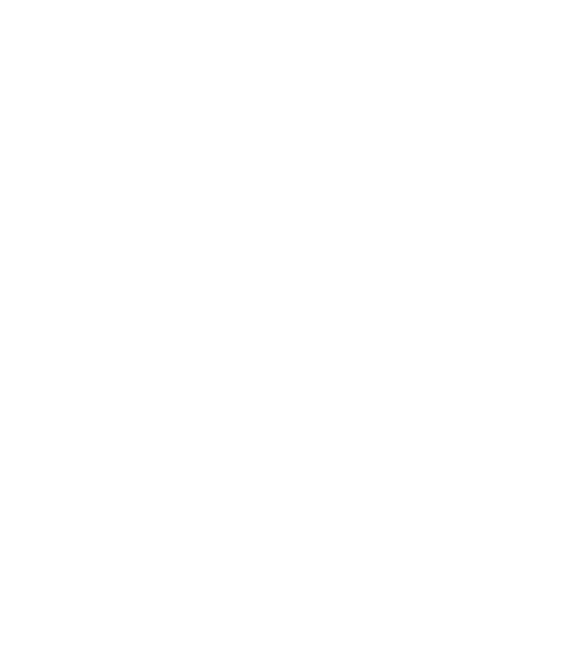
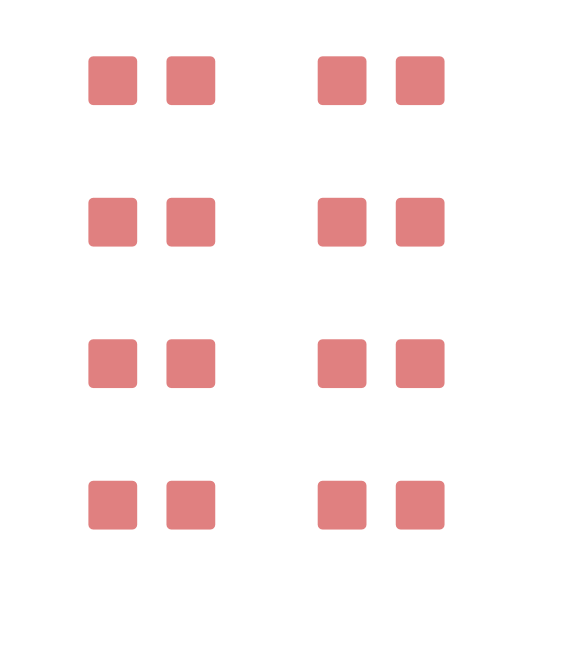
part: none -> (151, 80)
part: none -> (381, 80)
part: none -> (151, 222)
part: none -> (381, 222)
part: none -> (151, 363)
part: none -> (381, 363)
part: none -> (151, 505)
part: none -> (381, 505)

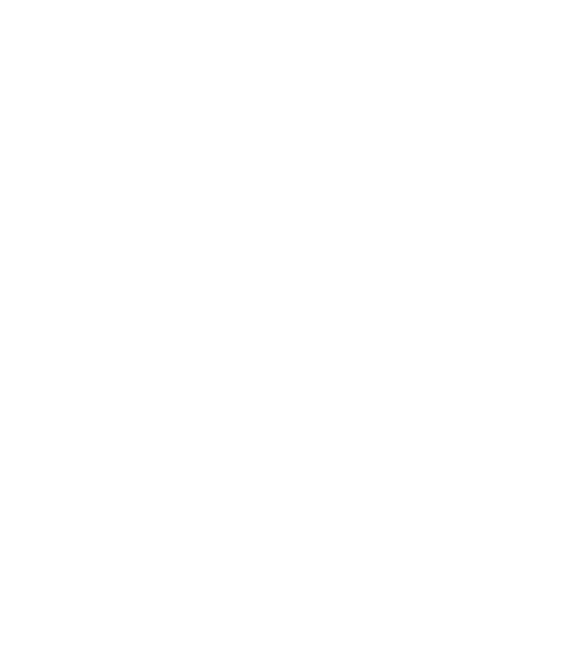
part: (151, 80) -> none
part: (381, 80) -> none
part: (151, 222) -> none
part: (381, 222) -> none
part: (151, 363) -> none
part: (381, 363) -> none
part: (151, 505) -> none
part: (381, 505) -> none

